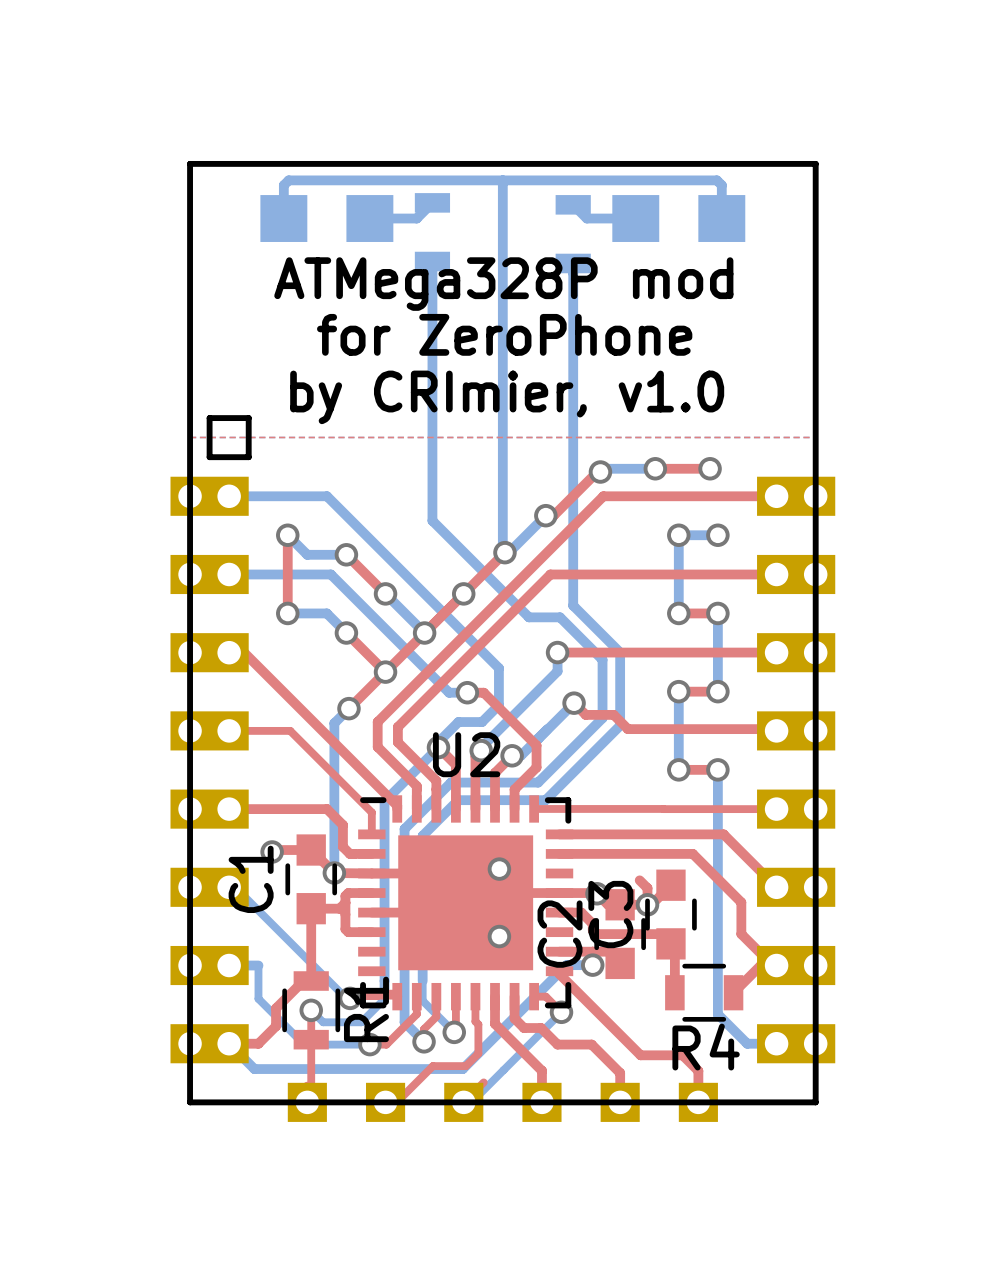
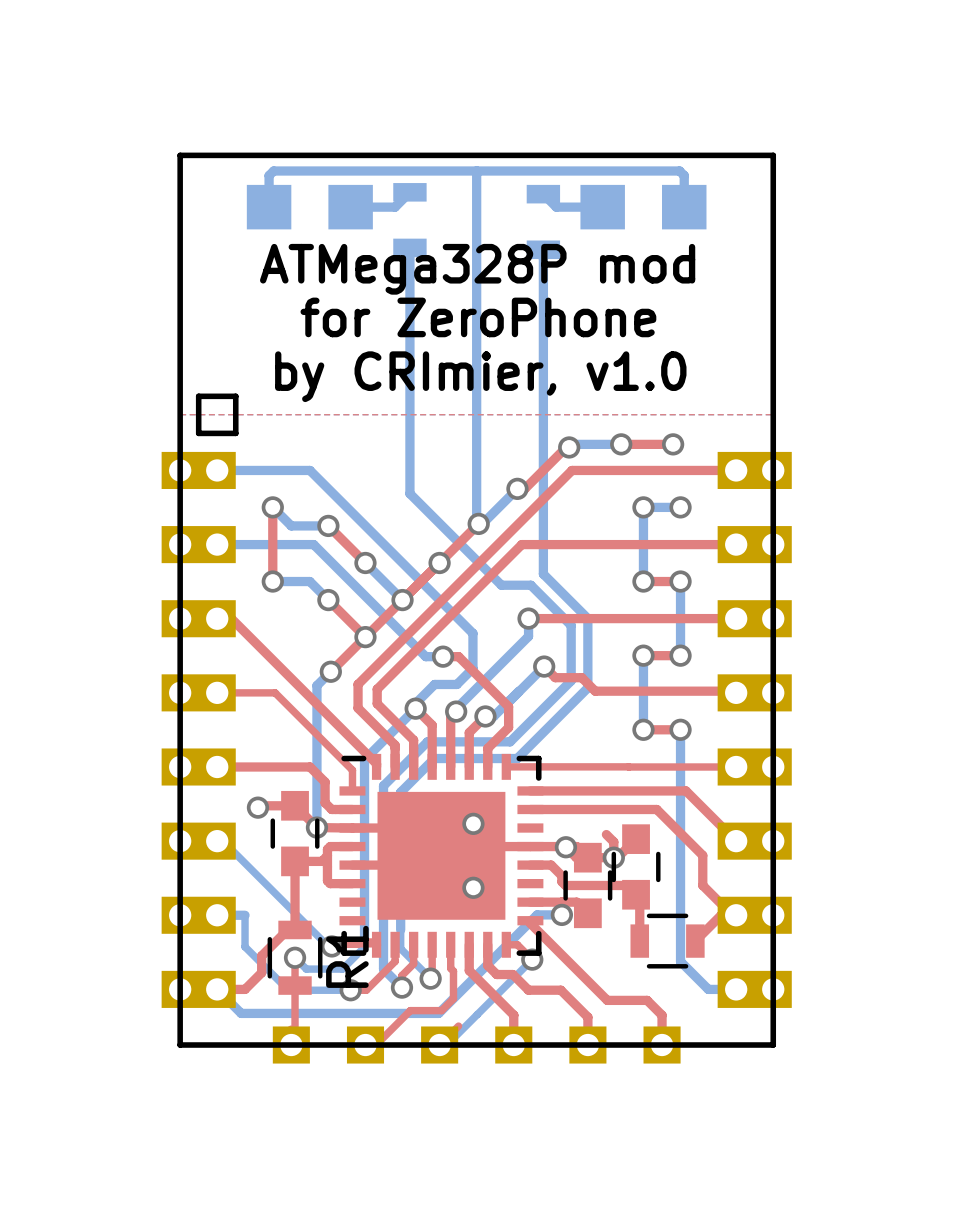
U2 name: U2 (466, 754) -> none
C1 name: C1 (251, 879) -> none
C3 name: C3 (610, 914) -> none
C2 name: C2 (560, 934) -> none
R4 name: R4 (706, 1047) -> none

